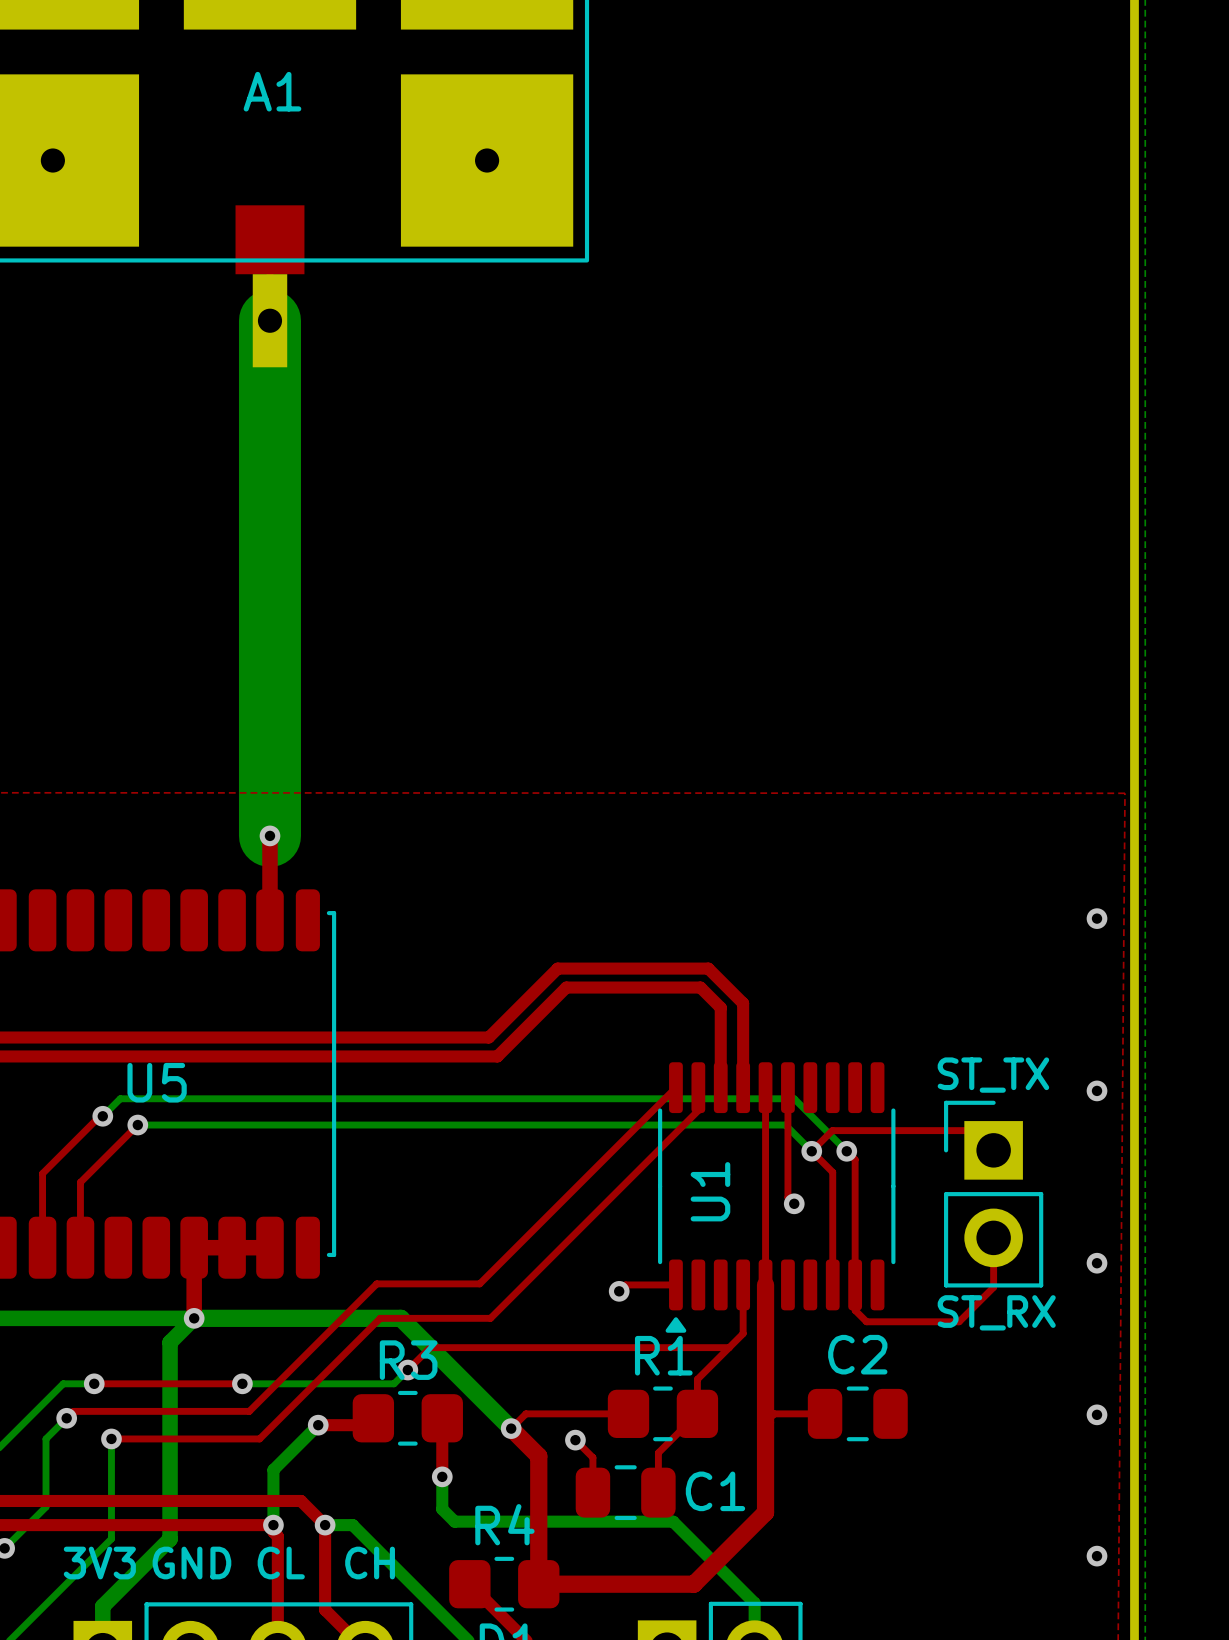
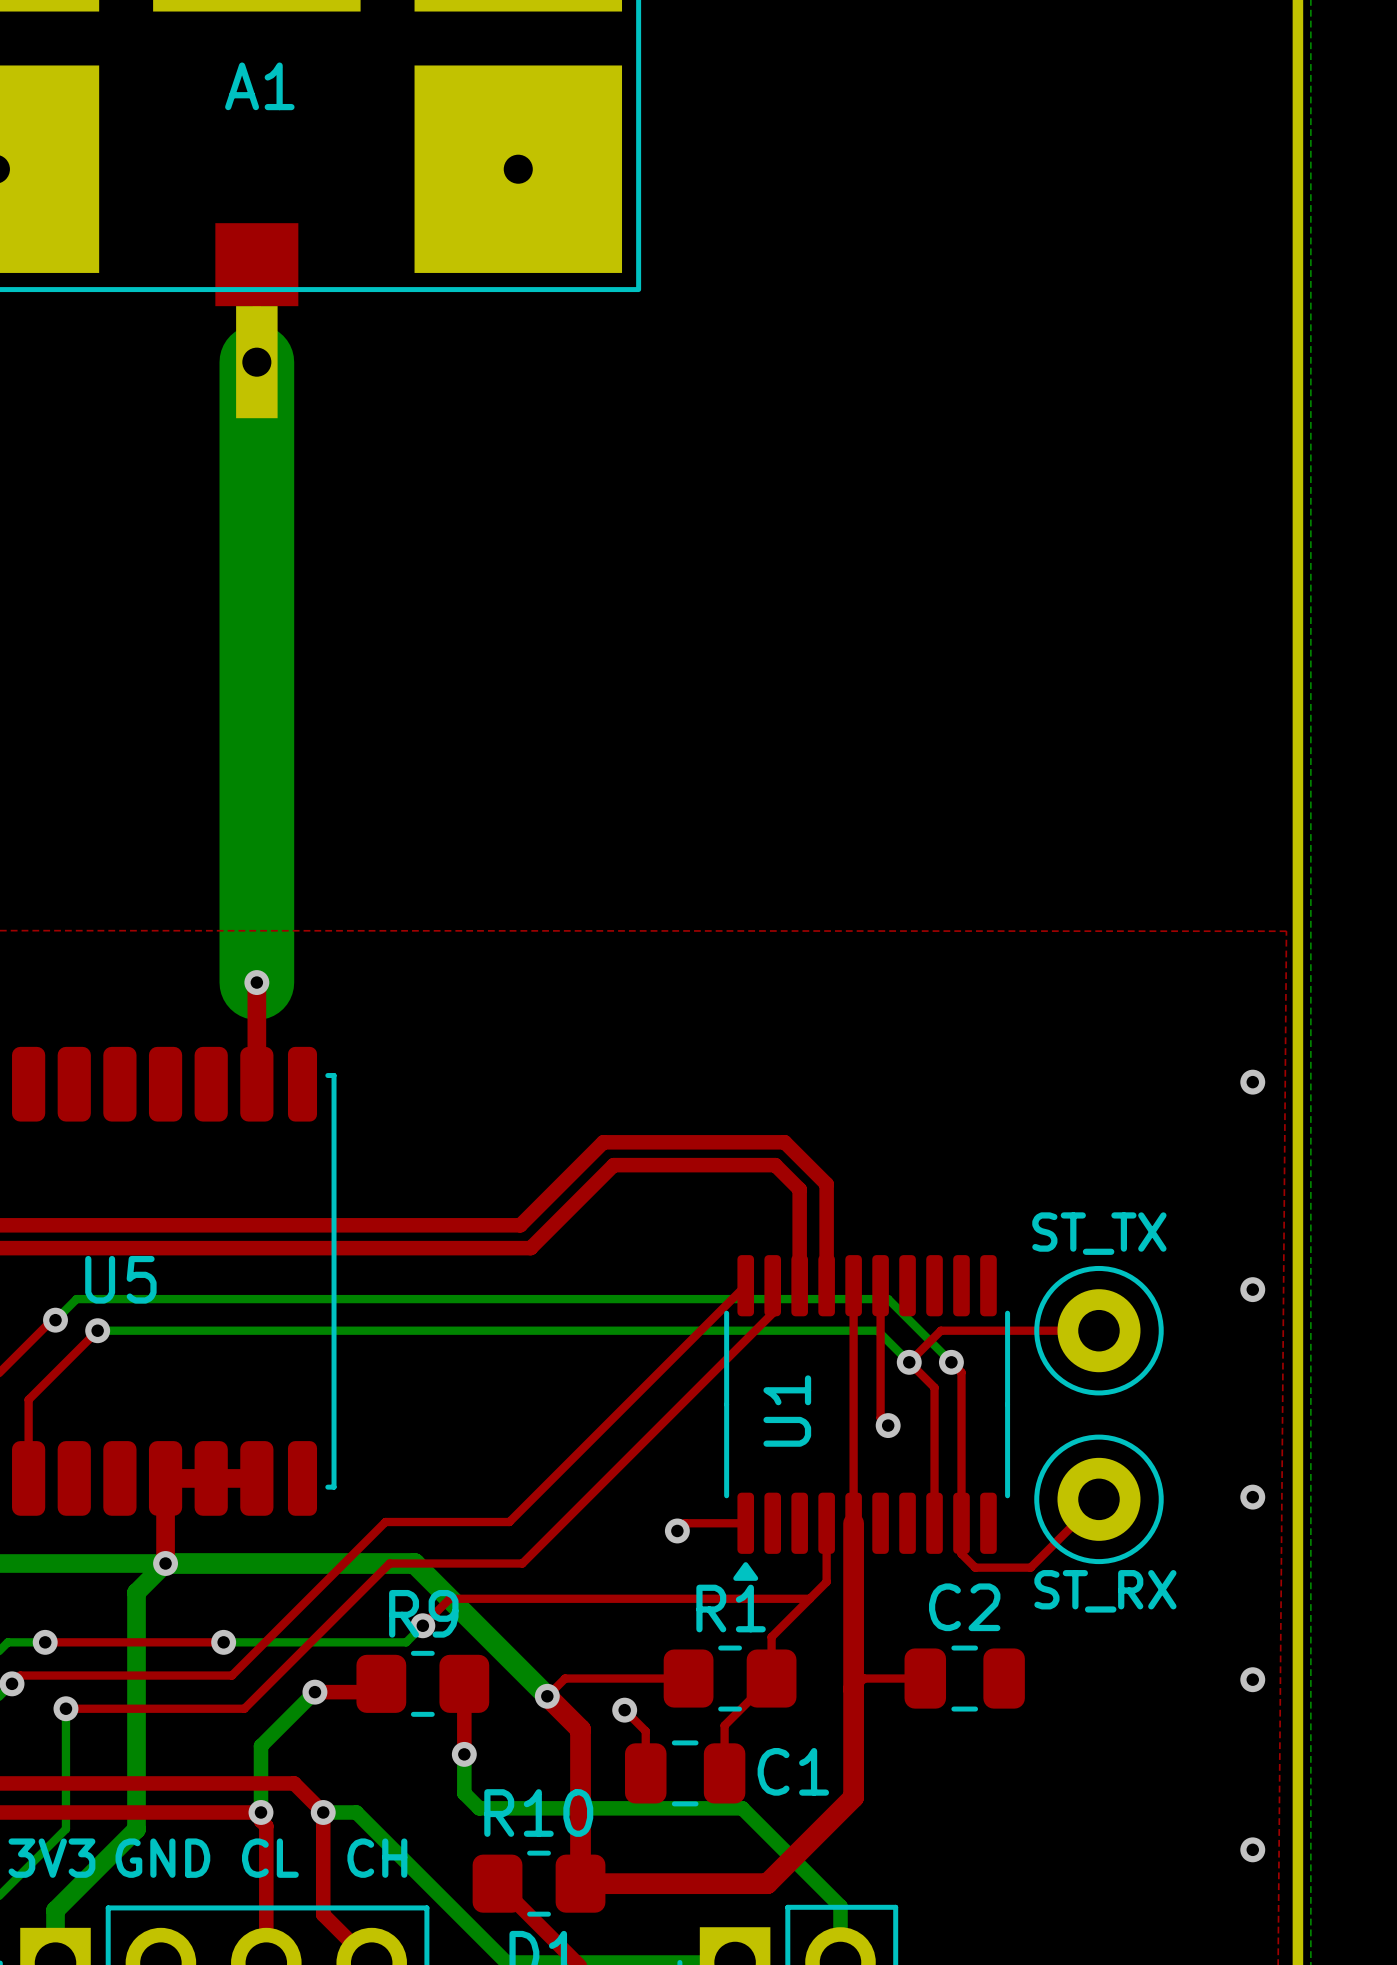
text position: ST_TX (993, 1075) -> ST_TX (1099, 1233)
part: none -> (1098, 1330)
top track: (832, 1130) (973, 1130) (993, 1150) -> (934, 1337) (940, 1330) (1098, 1330)
part: (993, 1194) -> none
top track: (993, 1237) (993, 1287) (959, 1321) (912, 1321) -> (1098, 1499) (1030, 1567)
part: none -> (1098, 1499)
text position: ST_RX (996, 1312) -> ST_RX (1105, 1591)
R3 name: R3 (408, 1360) -> R9 (423, 1613)
R4 name: R4 (504, 1524) -> R10 (538, 1813)

